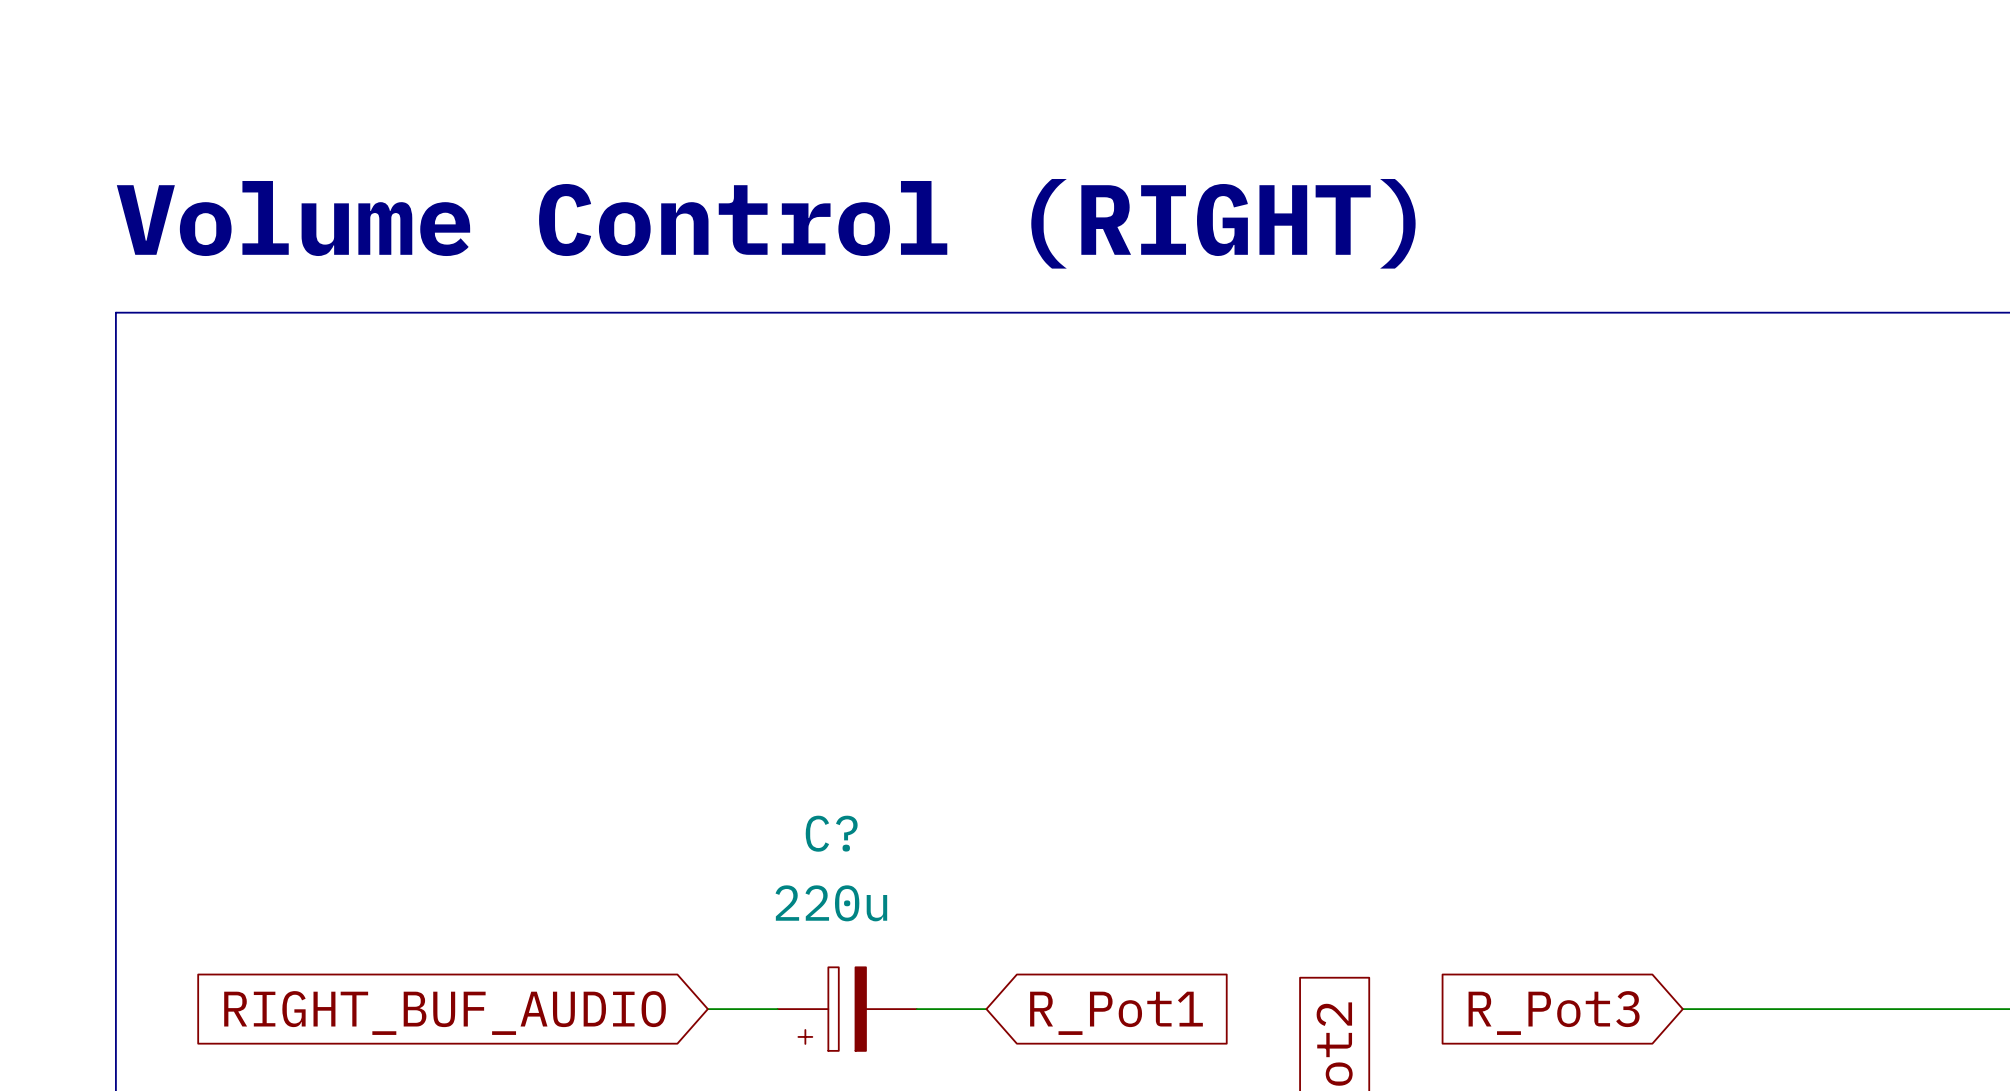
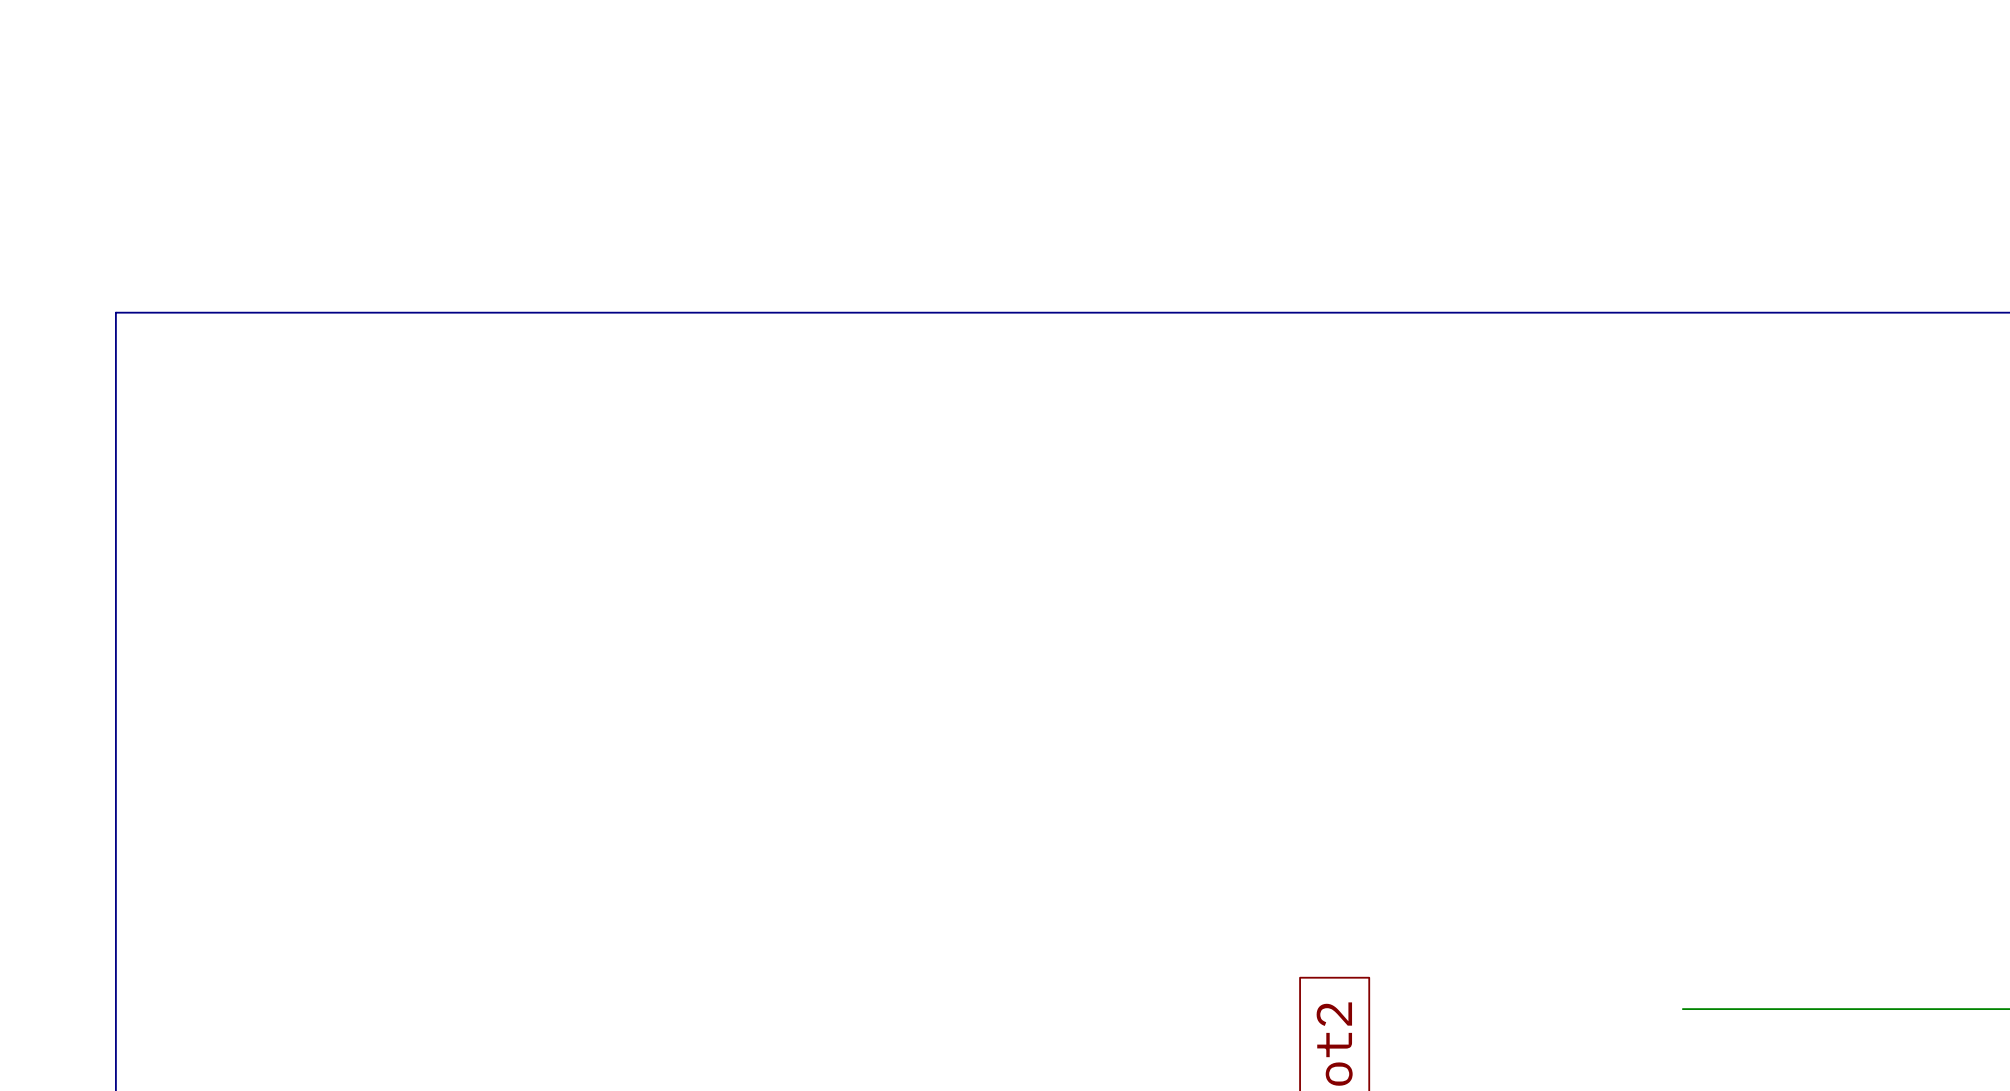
text: Volume Control (RIGHT) (766, 223) -> none
wire: (707, 1009) (777, 1009) -> none
C?: 220u (847, 1009) -> none
wire: (916, 1009) (986, 1009) -> none
global label: RIGHT_BUF_AUDIO (445, 1013) -> none
global label: R_Pot1 (1116, 1013) -> none
global label: R_Pot3 (1554, 1013) -> none

